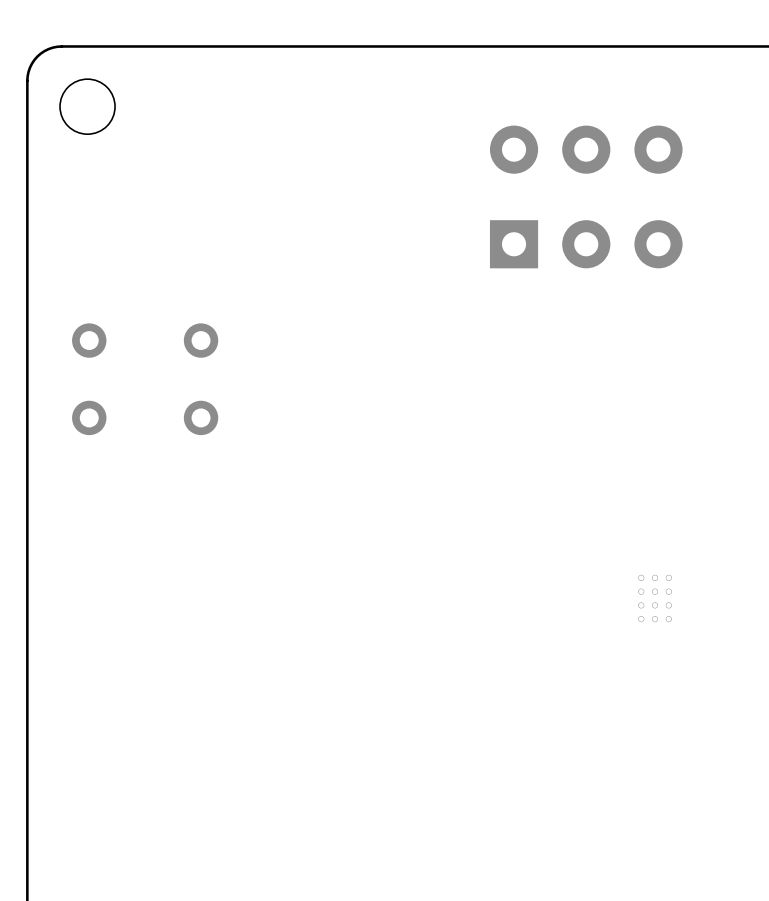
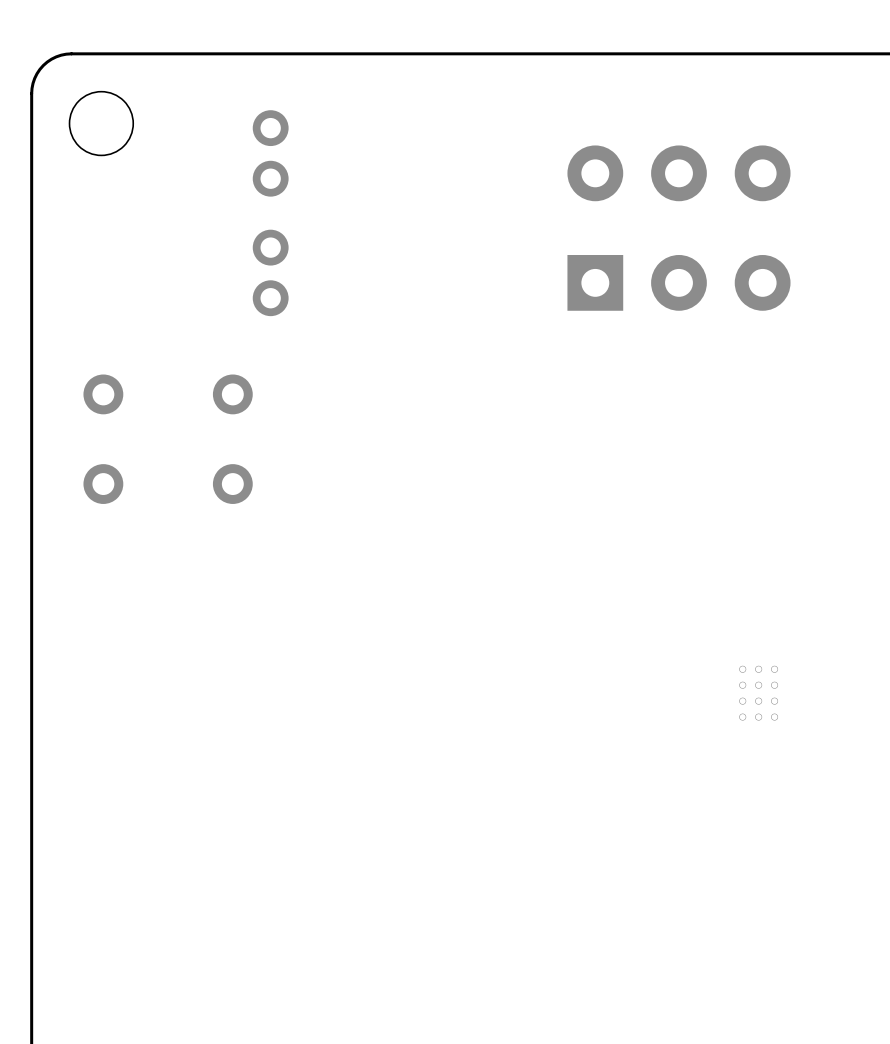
part: none -> (270, 153)
part: none -> (270, 272)

